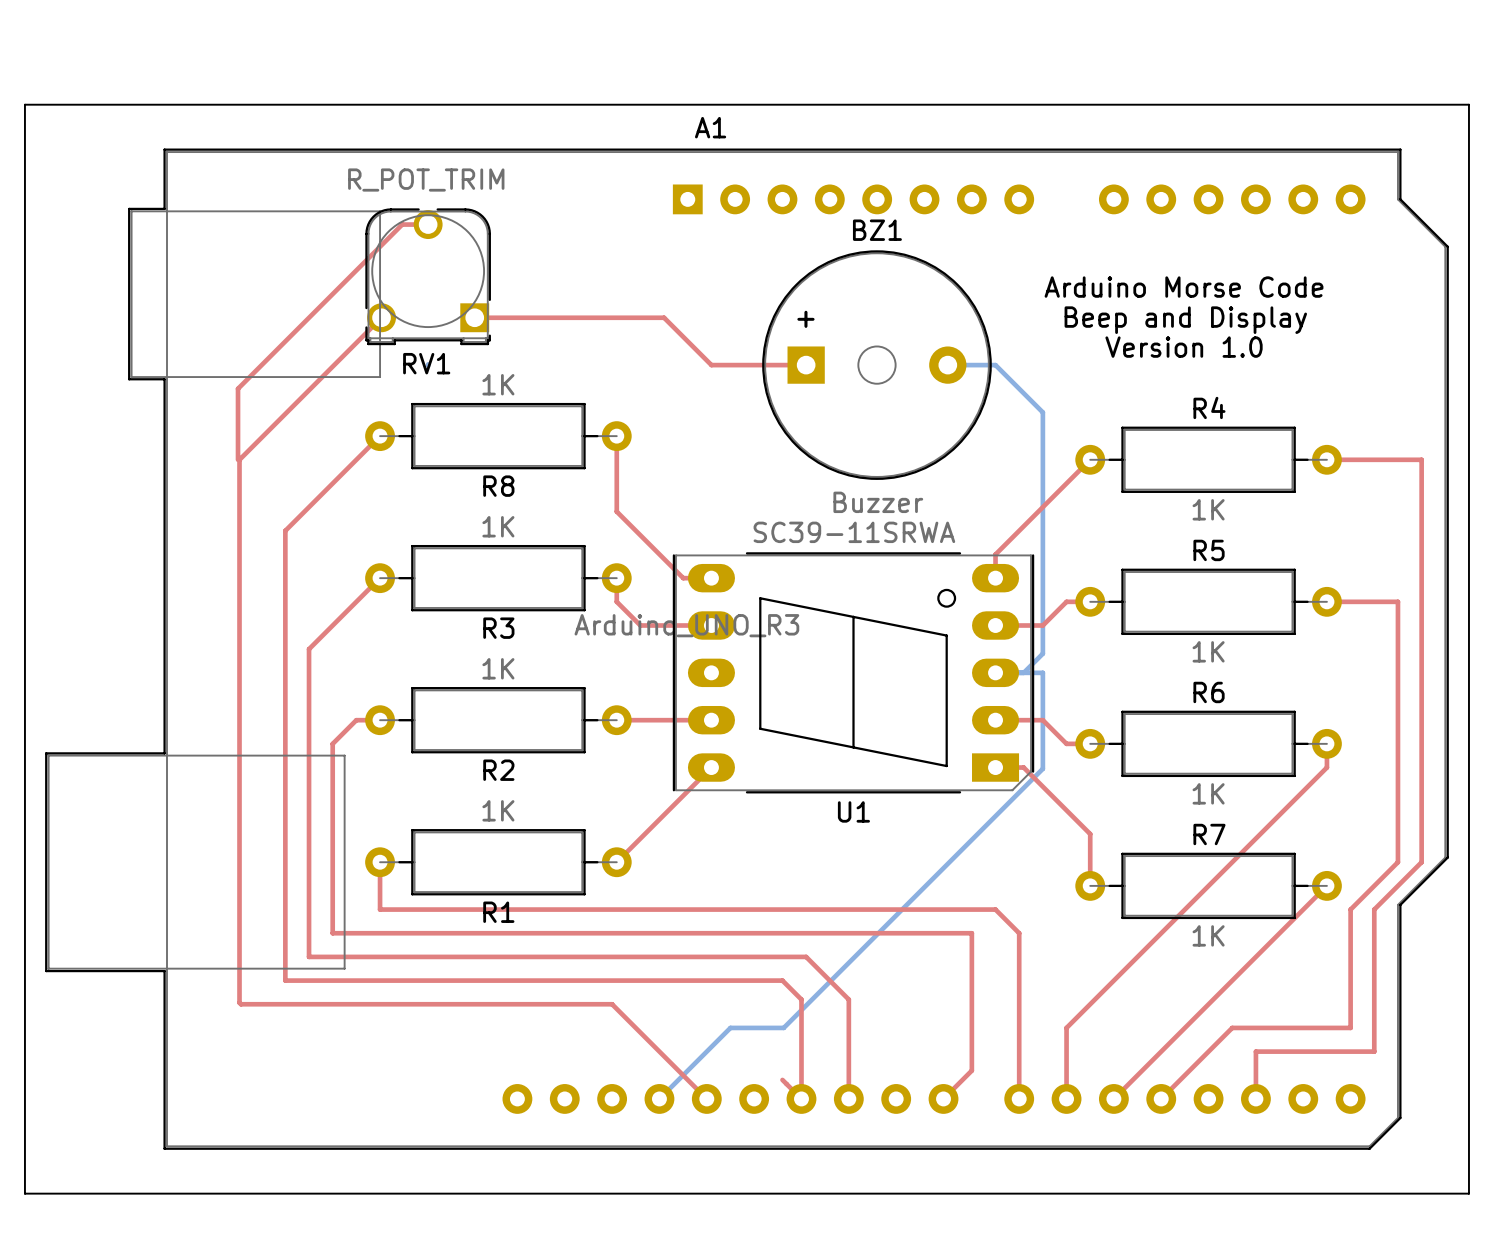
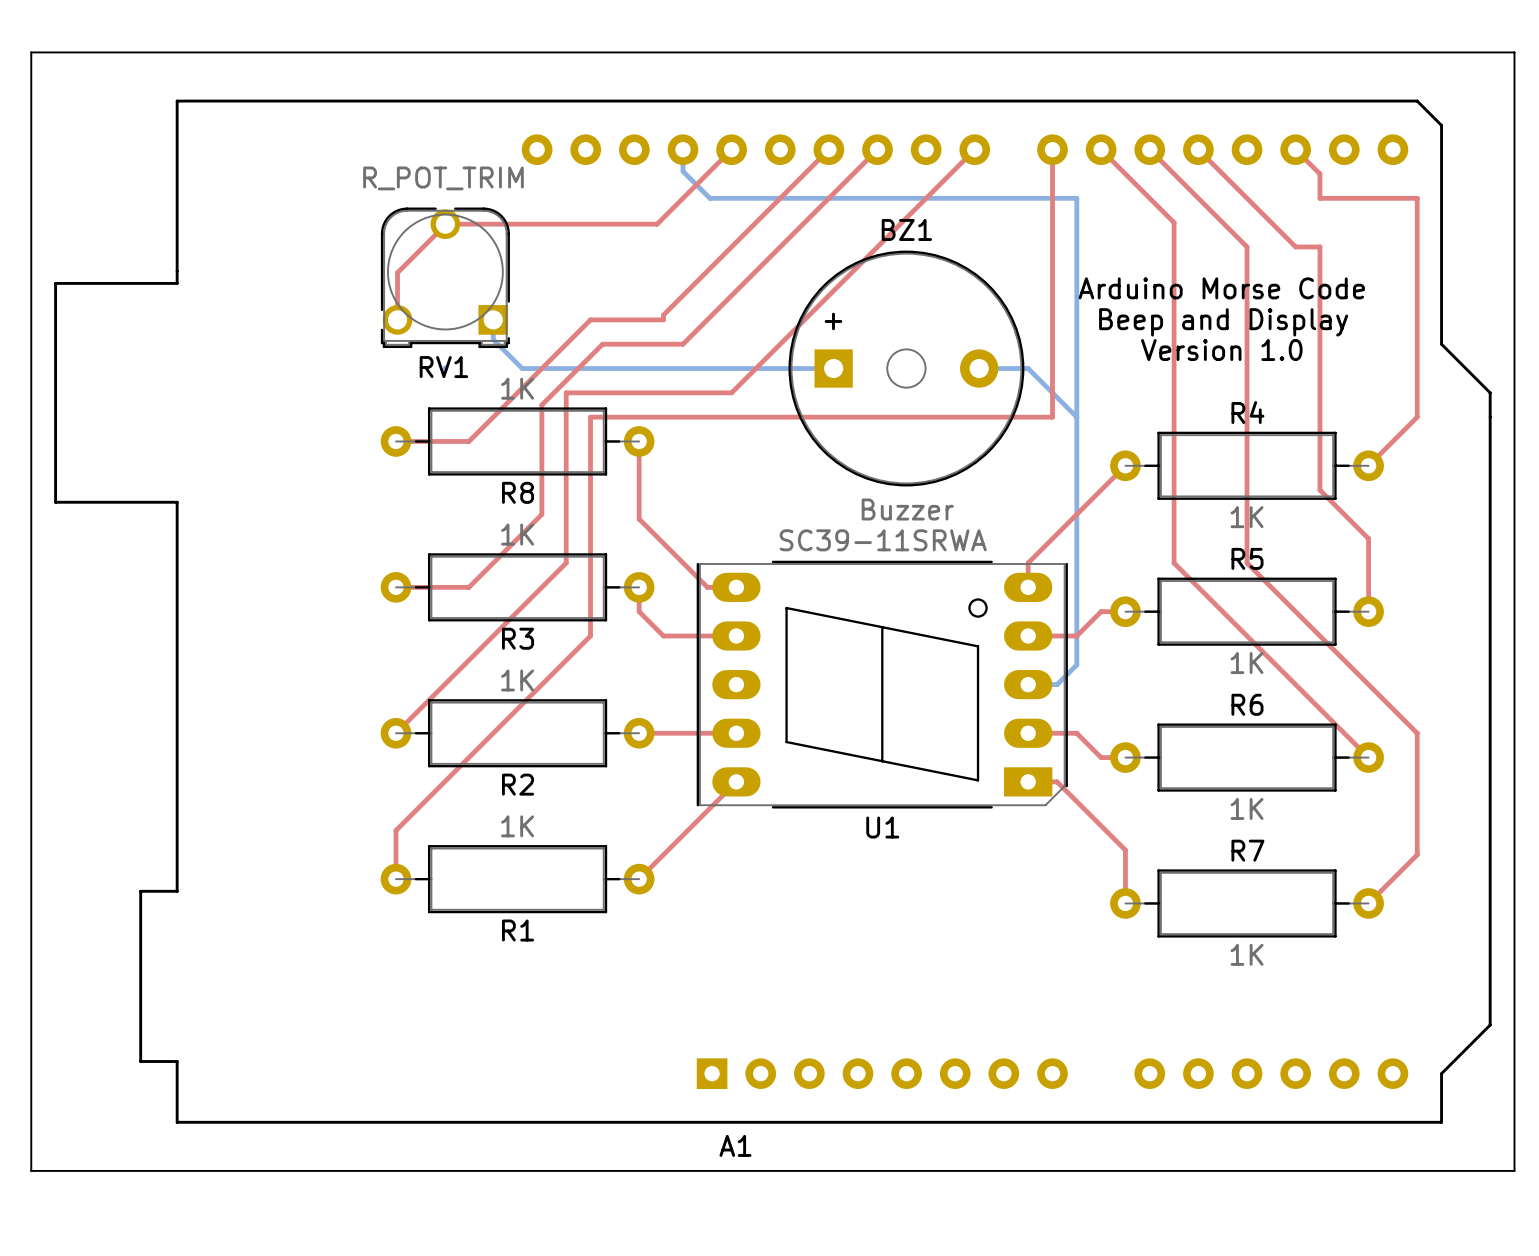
board edge: (24, 104) (1468, 104) -> (31, 101) (31, 52) (1514, 52) (1514, 101)
line: none -> (177, 101) (177, 283) (55, 283) (55, 502) (177, 502) (177, 891) (140, 891) (140, 1061) (177, 1061) (177, 1122) (1441, 1122) (1441, 1073) (1490, 1025) (1490, 392) (1441, 344) (1441, 125) (1417, 101) (177, 101)
bottom track: none -> (682, 149) (682, 171) (709, 198) (1076, 198) (1076, 417)
top track: (428, 224) (402, 224) (238, 388) (238, 459) -> none
top track: (381, 317) (239, 459) (239, 1002) (612, 1004) (706, 1098) -> (397, 319) (397, 272) (446, 224) (657, 224) (731, 149)
bottom track: none -> (493, 319) (493, 339) (522, 368) (833, 368)
top track: (474, 317) (569, 317) -> (395, 441) (468, 441) (590, 319)
top track: (640, 317) (664, 317) (711, 365) (806, 365) -> (663, 319) (663, 315) (828, 149)
top track: (380, 436) (285, 530) (285, 980) (782, 980) (801, 999) (801, 1098) (782, 1079) -> none
top track: (1326, 459) (1421, 459) (1421, 862) (1374, 909) (1374, 1051) (1255, 1051) (1255, 1098) -> (1368, 465) (1417, 417) (1417, 198) (1319, 198) (1319, 174) (1295, 149)
top track: (380, 578) (309, 649) (309, 956) (806, 956) (848, 999) (848, 1098) -> (395, 587) (468, 587) (541, 514) (541, 404) (602, 344) (682, 344) (877, 149)
top track: (1326, 601) (1397, 601) (1397, 862) (1350, 909) (1350, 1027) (1232, 1027) (1161, 1098) -> (1368, 611) (1368, 538) (1319, 490) (1319, 246) (1295, 246) (1198, 149)
A1 side: top (746, 649) -> bottom (965, 611)
bottom track: (1023, 672) (1042, 672) (1042, 768) (783, 1027) (730, 1027) (659, 1098) -> none
top track: (380, 720) (356, 720) (332, 743) (332, 933) (971, 933) (971, 1070) (943, 1098) -> (395, 733) (566, 563) (566, 392) (731, 392) (974, 149)
top track: (1326, 743) (1326, 767) (1066, 1027) (1066, 1098) -> (1368, 757) (1174, 563) (1174, 222) (1101, 149)
top track: (380, 862) (380, 909) (995, 909) (1019, 933) (1019, 1098) -> (395, 879) (395, 830) (590, 635) (590, 417) (1052, 417) (1052, 149)
top track: (1326, 885) (1113, 1098) -> (1368, 903) (1417, 854) (1417, 733) (1247, 563) (1247, 246) (1149, 149)
board edge: (24, 1146) (24, 1193) (1468, 1193) (1468, 1146) -> (31, 1170) (1514, 1170)

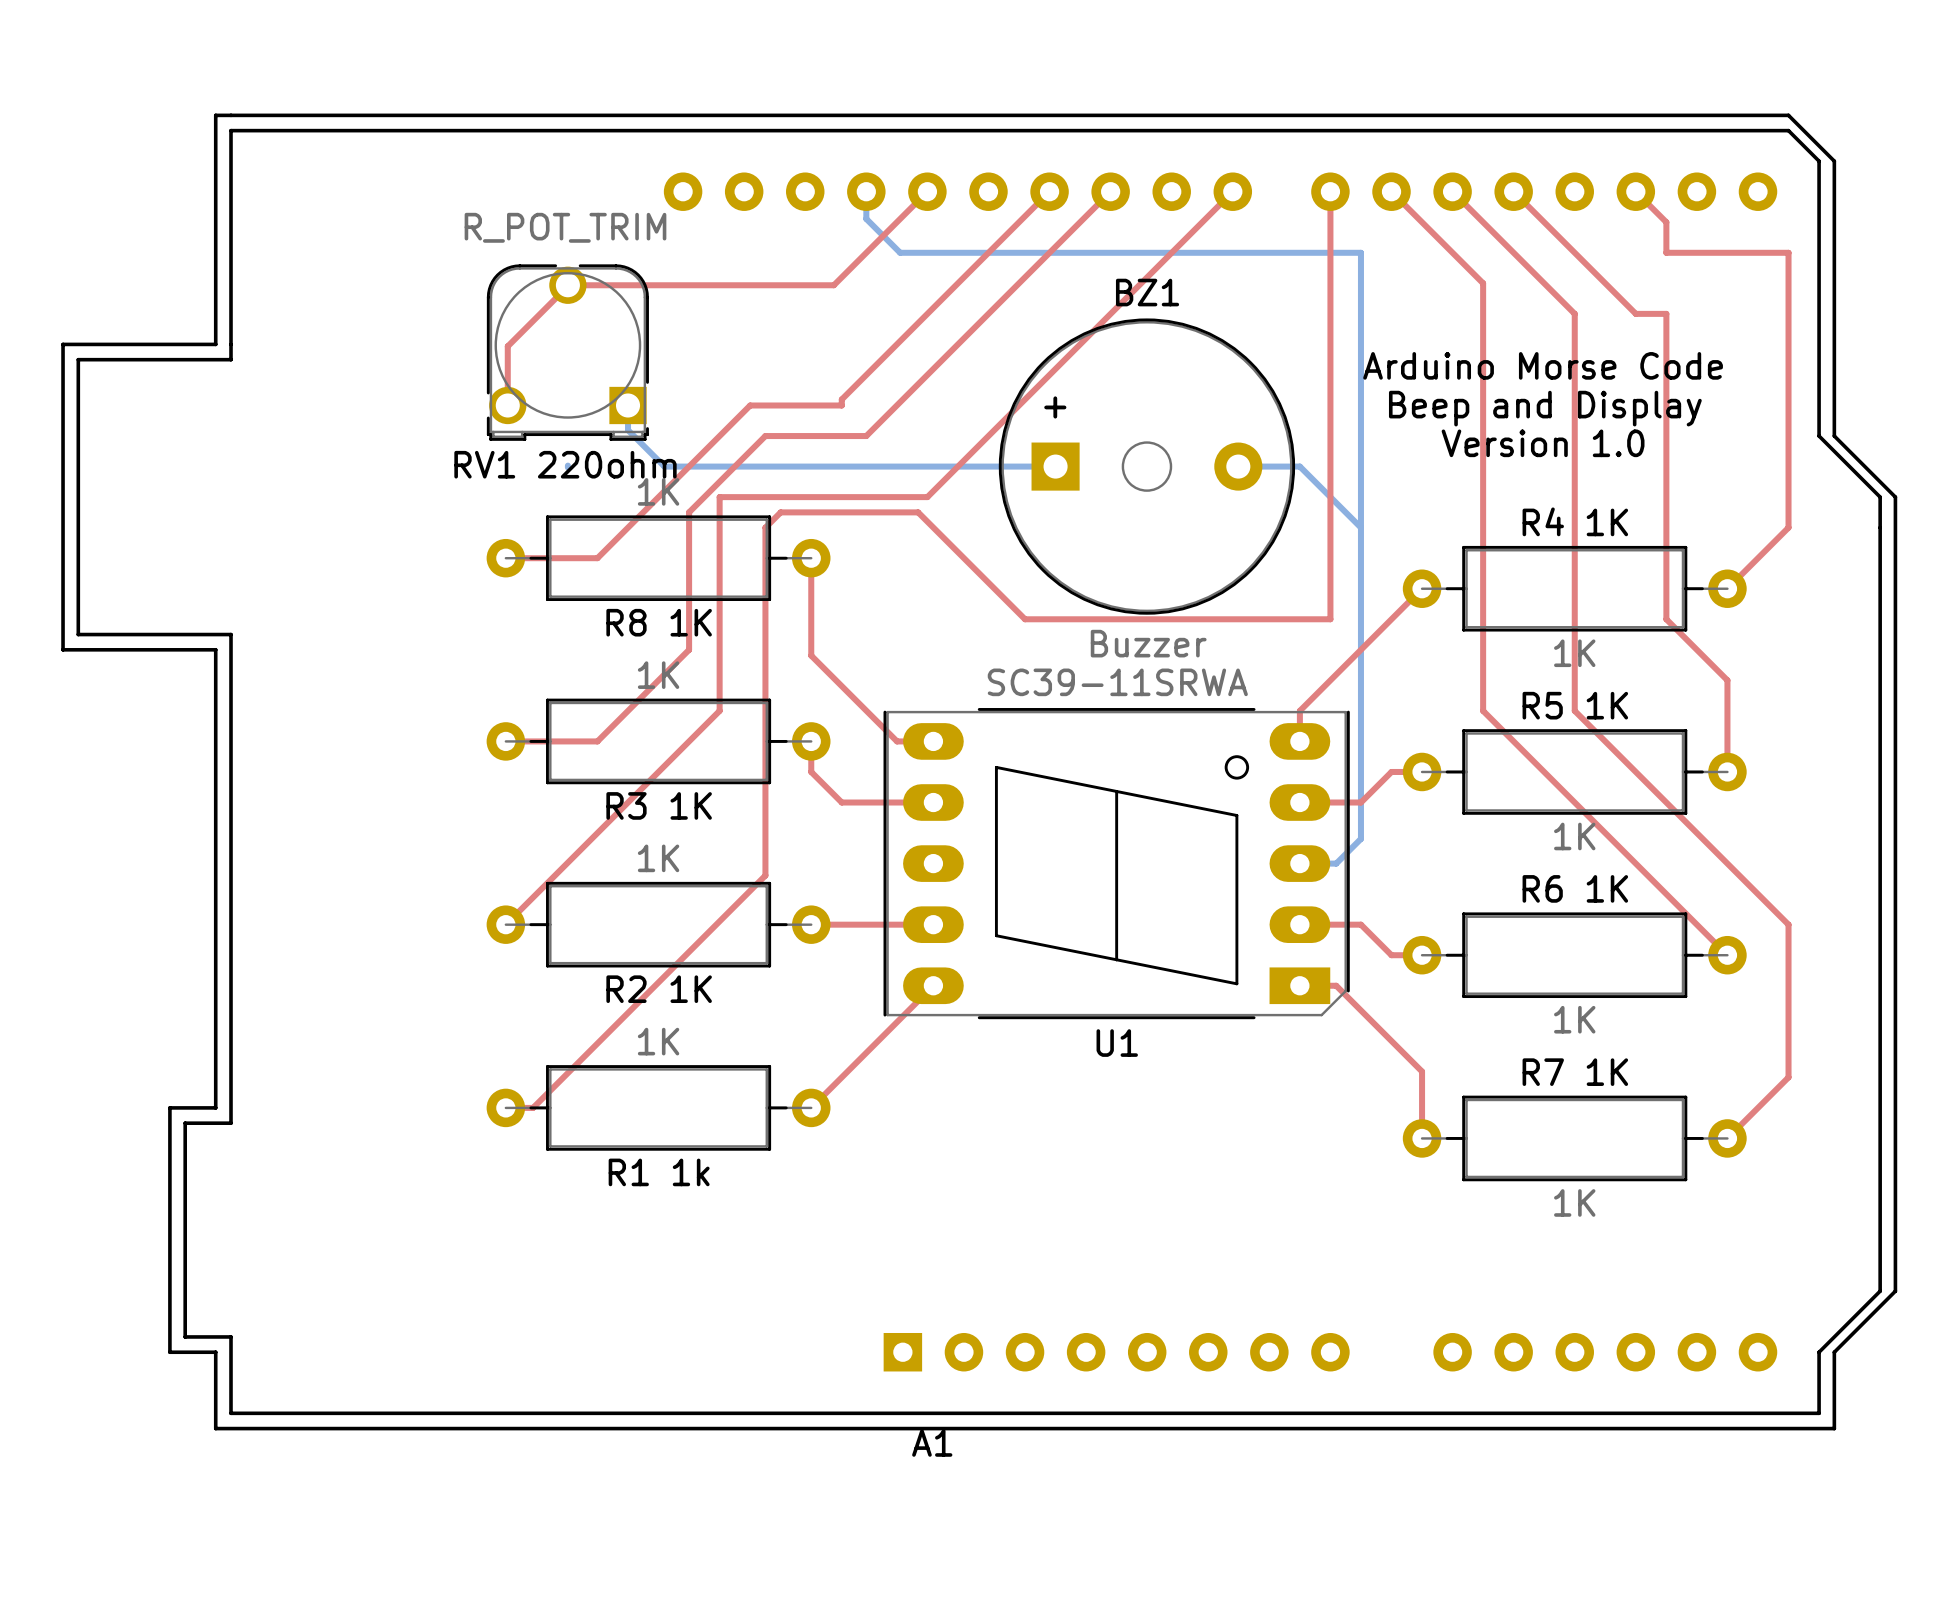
board edge: (31, 52) (1514, 52) (1514, 1170) (31, 1170) (31, 52) -> (215, 115) (215, 344) (63, 344) (63, 649) (215, 649) (215, 1107) (169, 1107) (169, 1352) (215, 1352) (215, 1428) (1834, 1428) (1834, 1352) (1895, 1291) (1895, 497) (1834, 436) (1834, 161) (1788, 115) (215, 115)
RV1 name: RV1 (443, 367) -> RV1 220ohm (565, 464)
R4 name: R4 (1247, 412) -> R4 1K (1575, 521)
top track: (1052, 417) (590, 417) (590, 635) (395, 830) (395, 879) -> (1330, 527) (1330, 619) (1025, 619) (918, 512) (780, 512) (765, 527) (765, 875) (533, 1107) (505, 1107)
R8 name: R8 (518, 492) -> R8 1K (659, 622)
R5 name: R5 (1247, 558) -> R5 1K (1575, 705)
R3 name: R3 (518, 638) -> R3 1K (659, 805)
R6 name: R6 (1247, 704) -> R6 1K (1575, 888)
R2 name: R2 (518, 784) -> R2 1K (659, 989)
R7 name: R7 (1247, 850) -> R7 1K (1575, 1072)
R1 name: R1 (518, 930) -> R1 1k (659, 1172)

